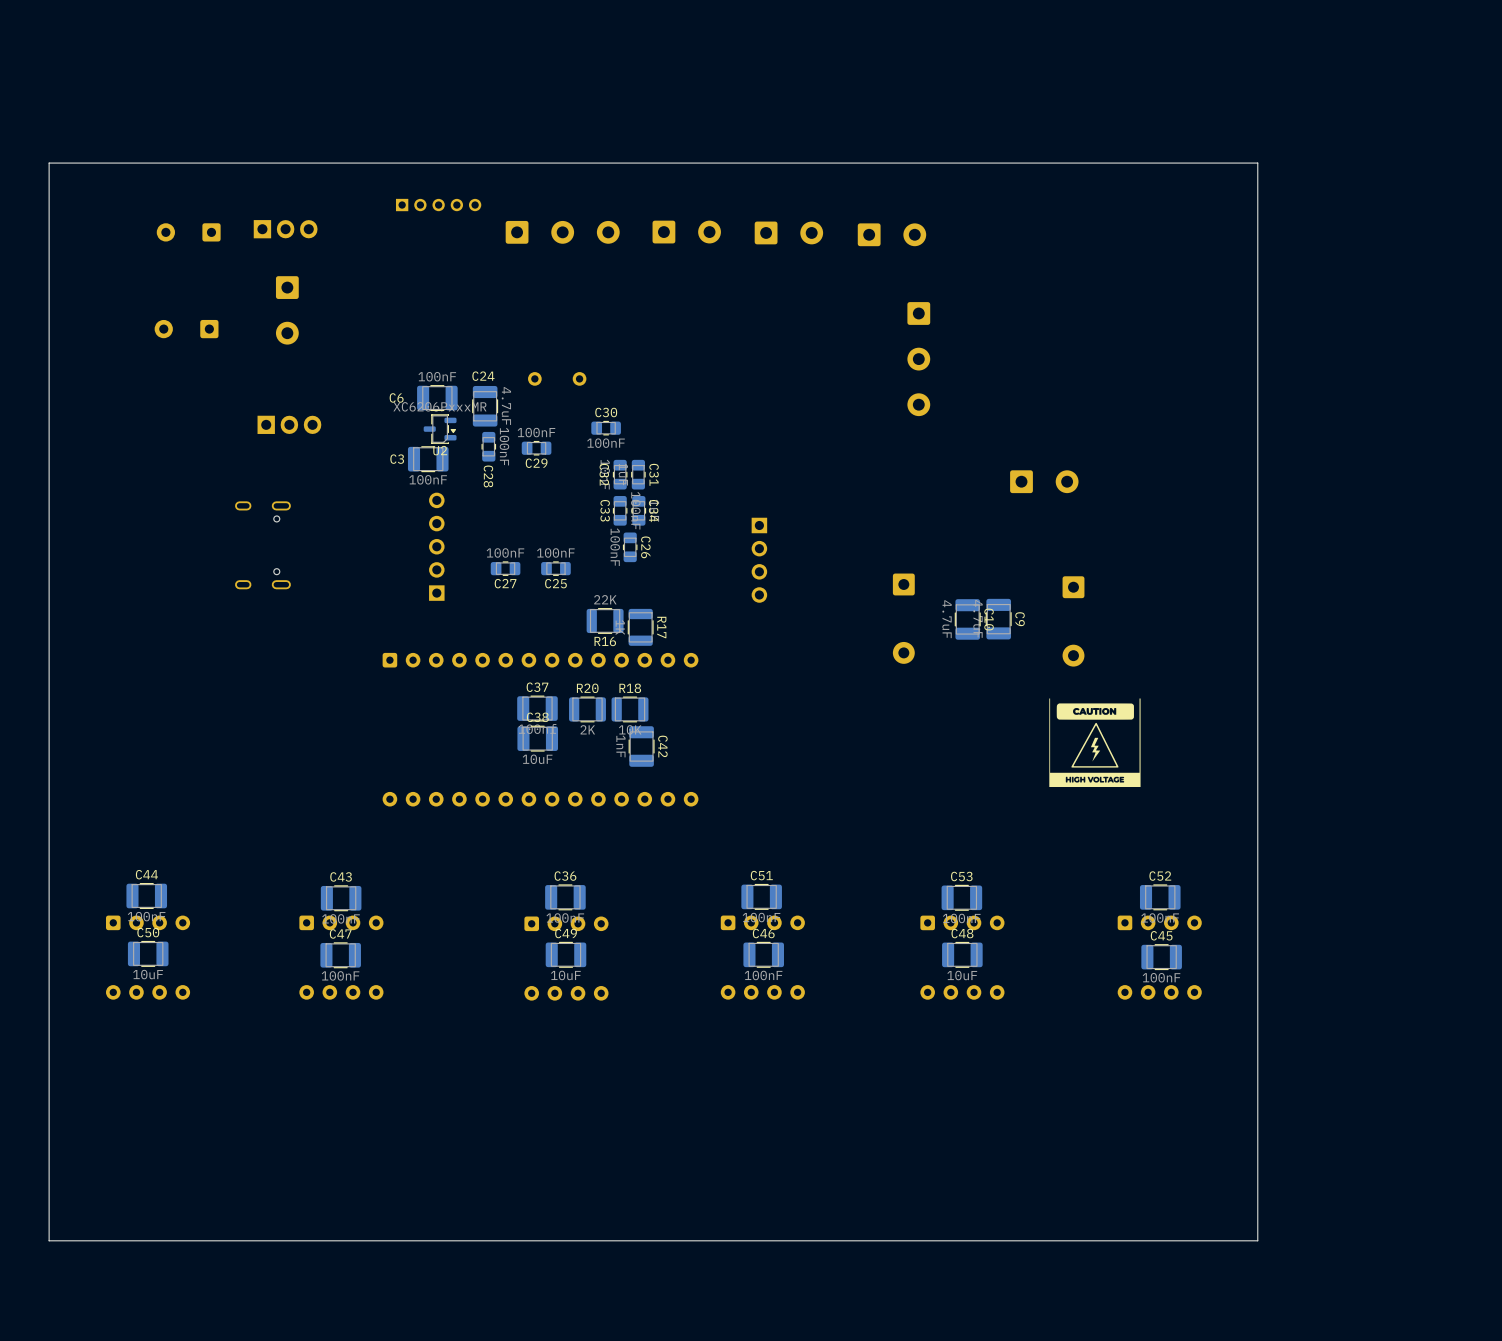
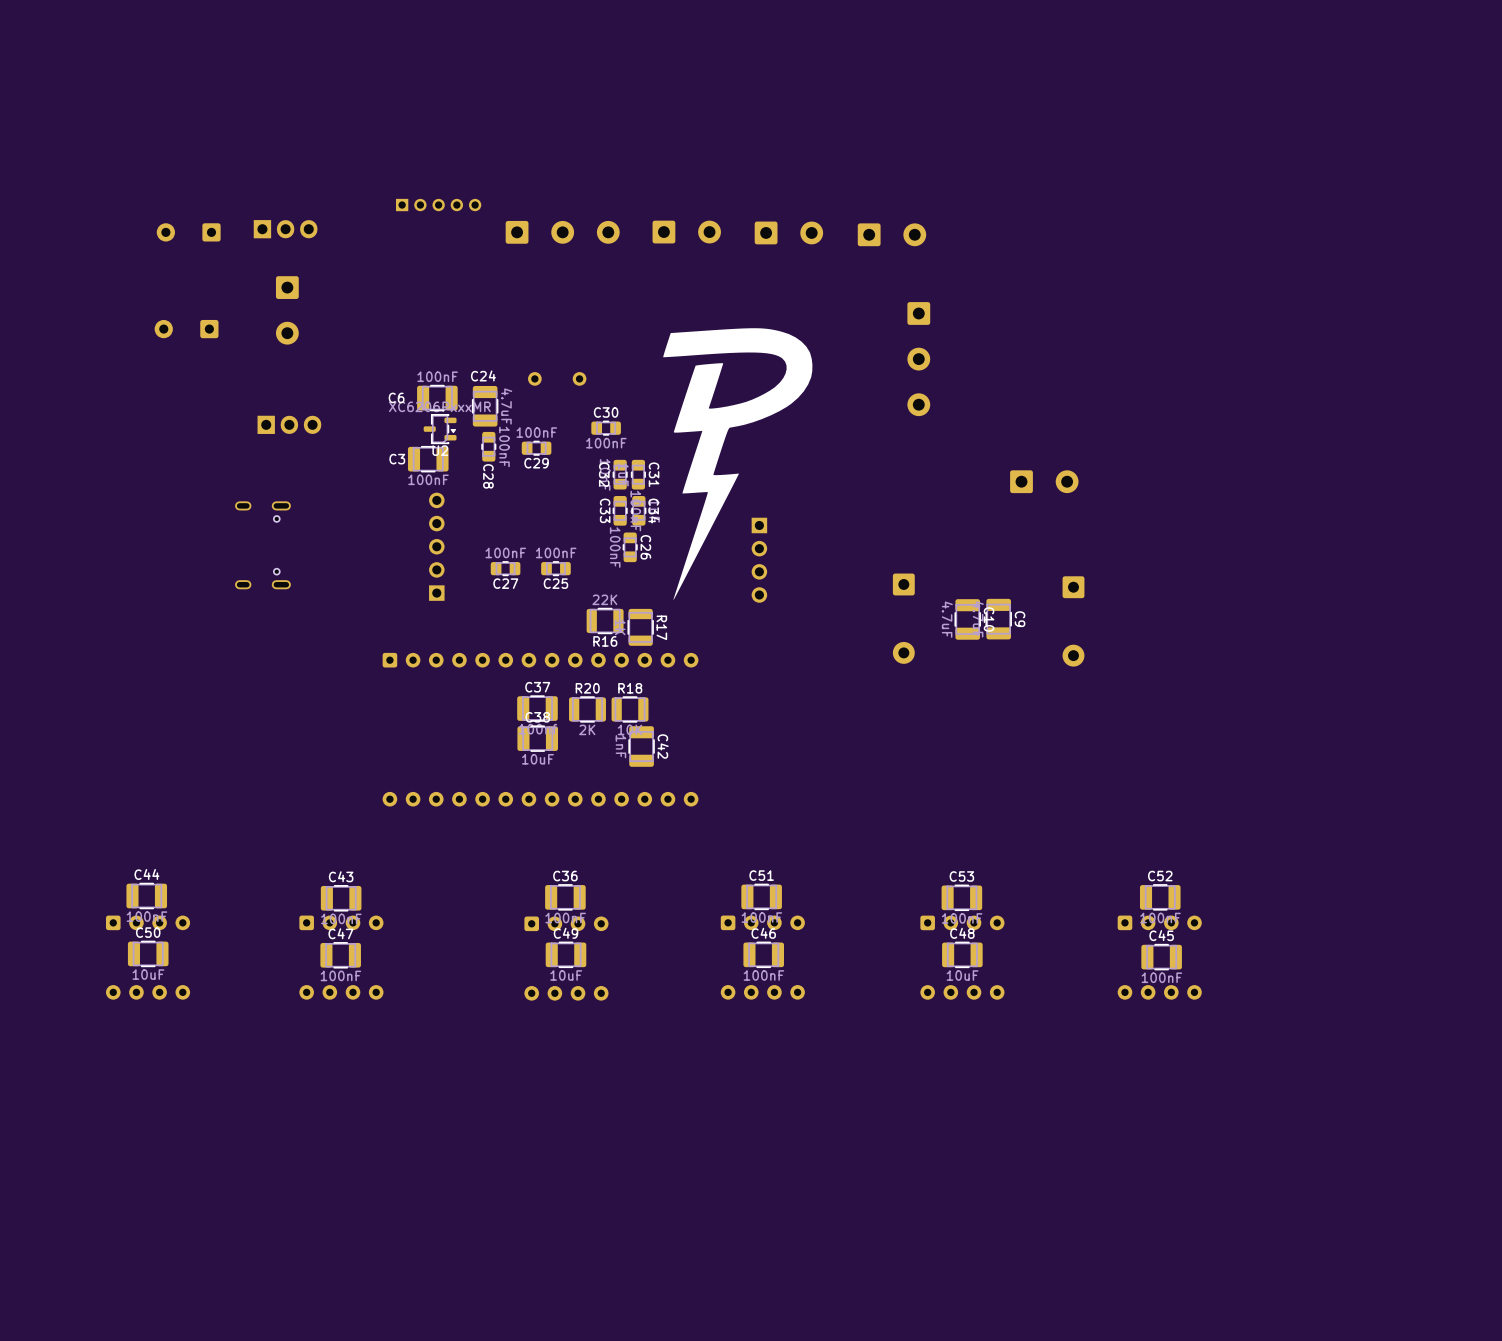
board edge: (1257, 163) (49, 163) (49, 1240) (1257, 1240) (1257, 163) -> none
drawing: none -> [663, 328, 813, 600]
drawing: [1049, 698, 1141, 788] -> none

